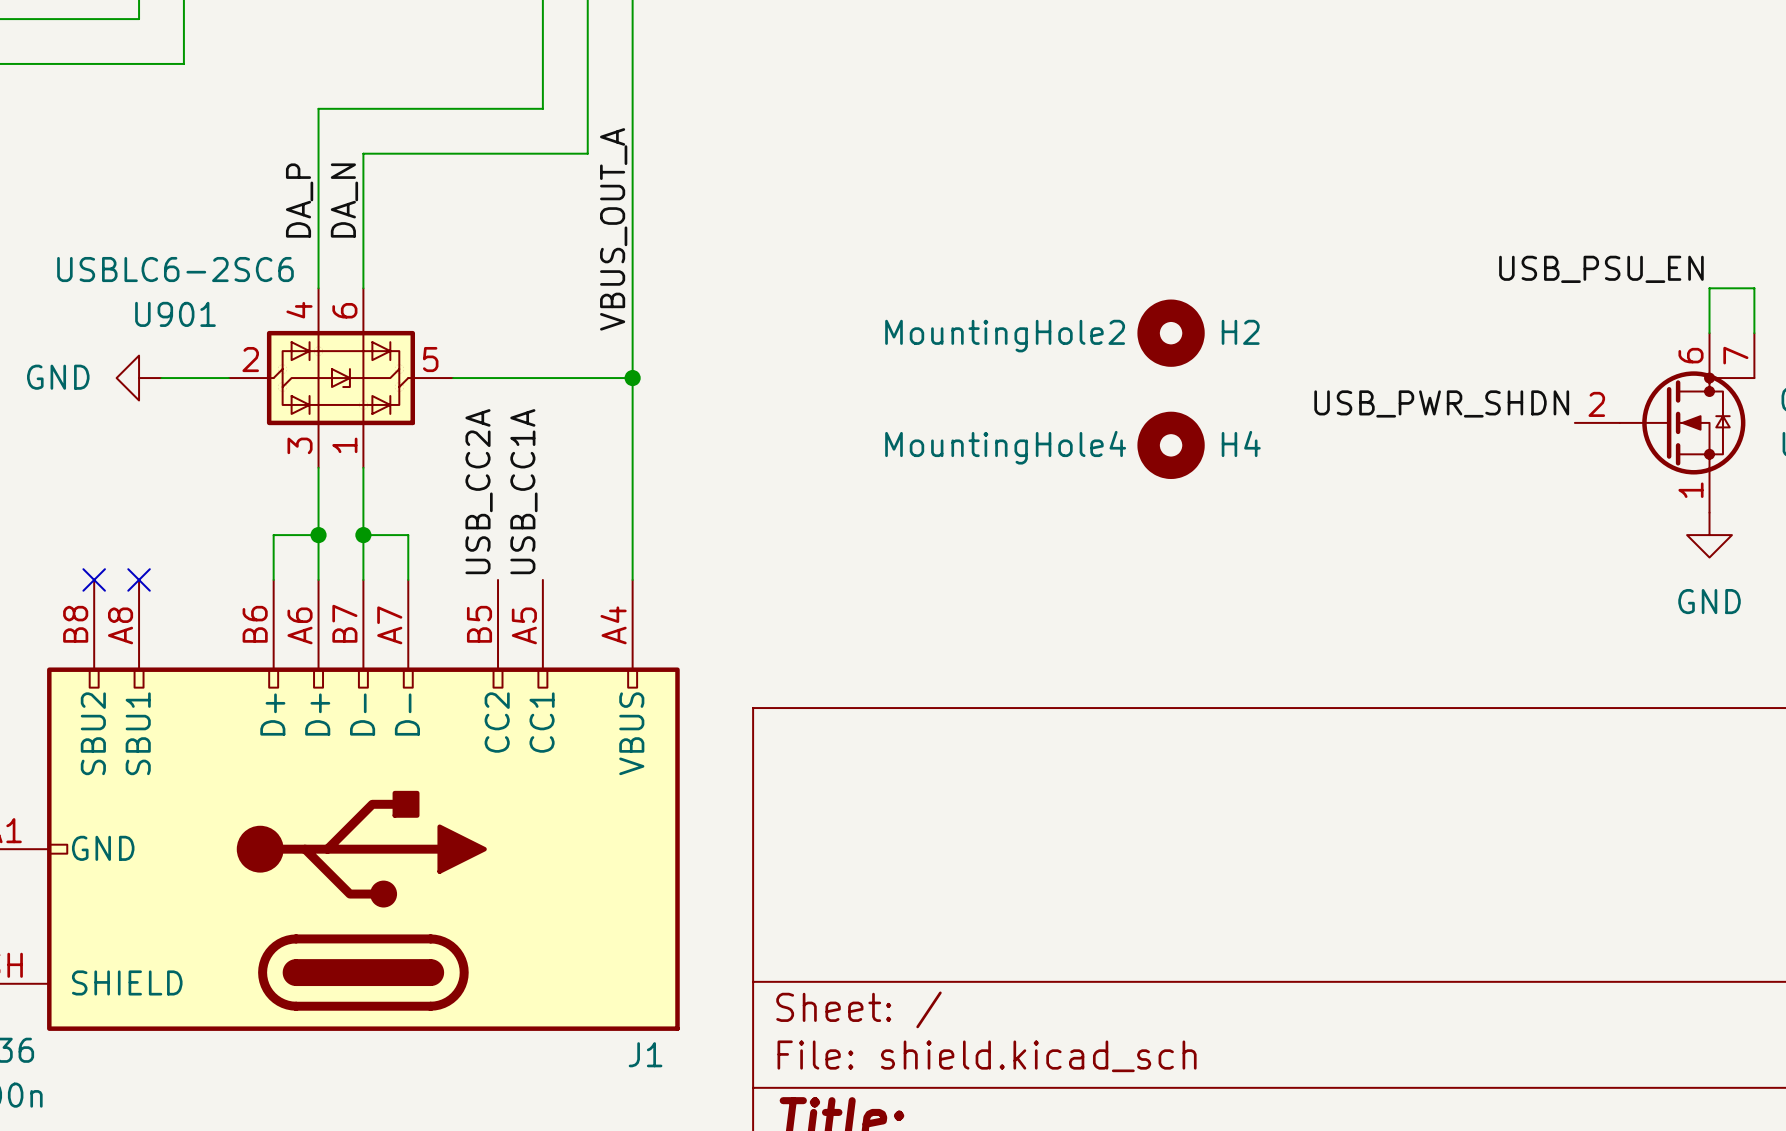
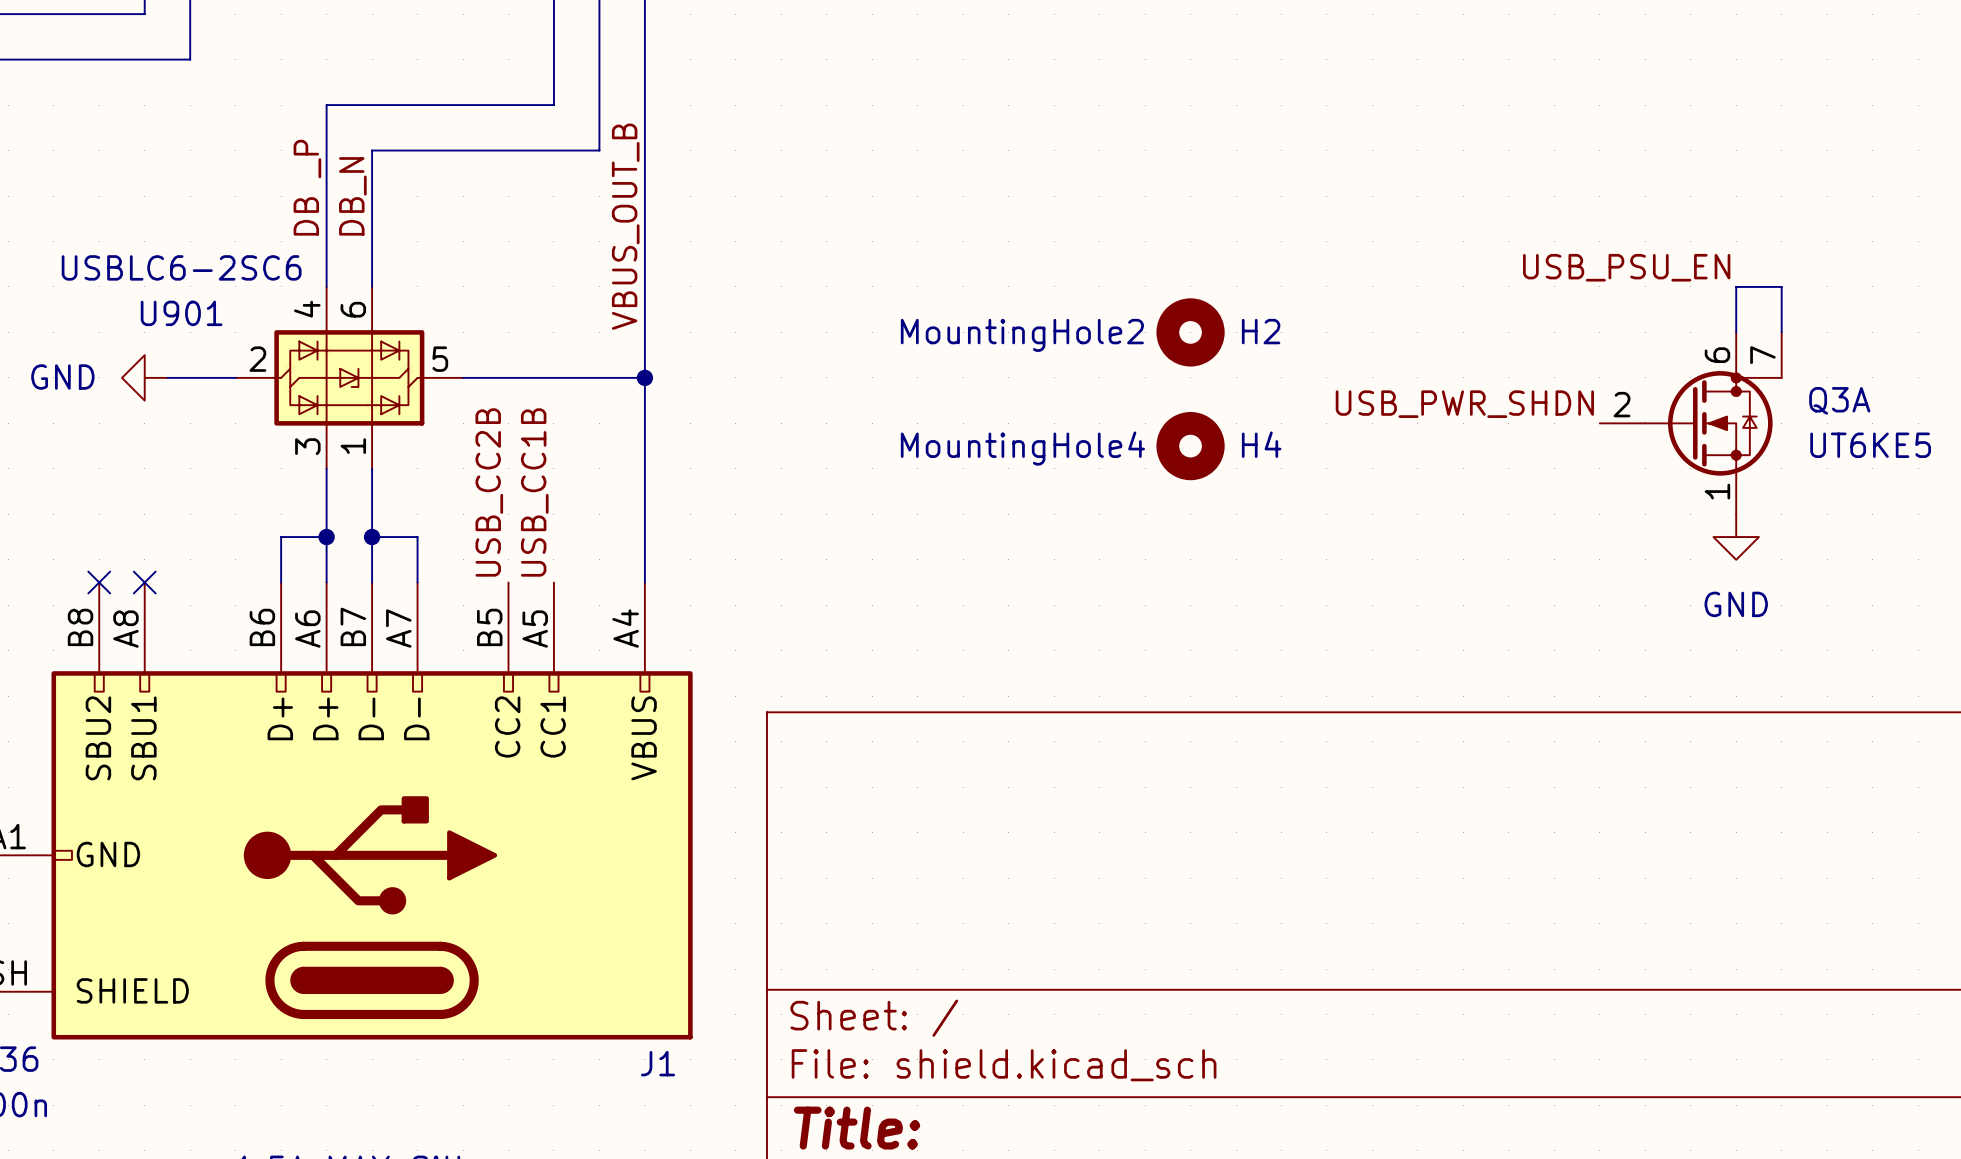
label: DA_P (299, 200) -> DB _P (307, 187)
label: DA_N (344, 200) -> DB_N (352, 196)
label: VBUS_OUT_A (613, 229) -> VBUS_OUT_B (625, 226)
label: USB_CC2A (479, 491) -> USB_CC2B (489, 492)
label: USB_CC1A (523, 491) -> USB_CC1B (534, 492)

